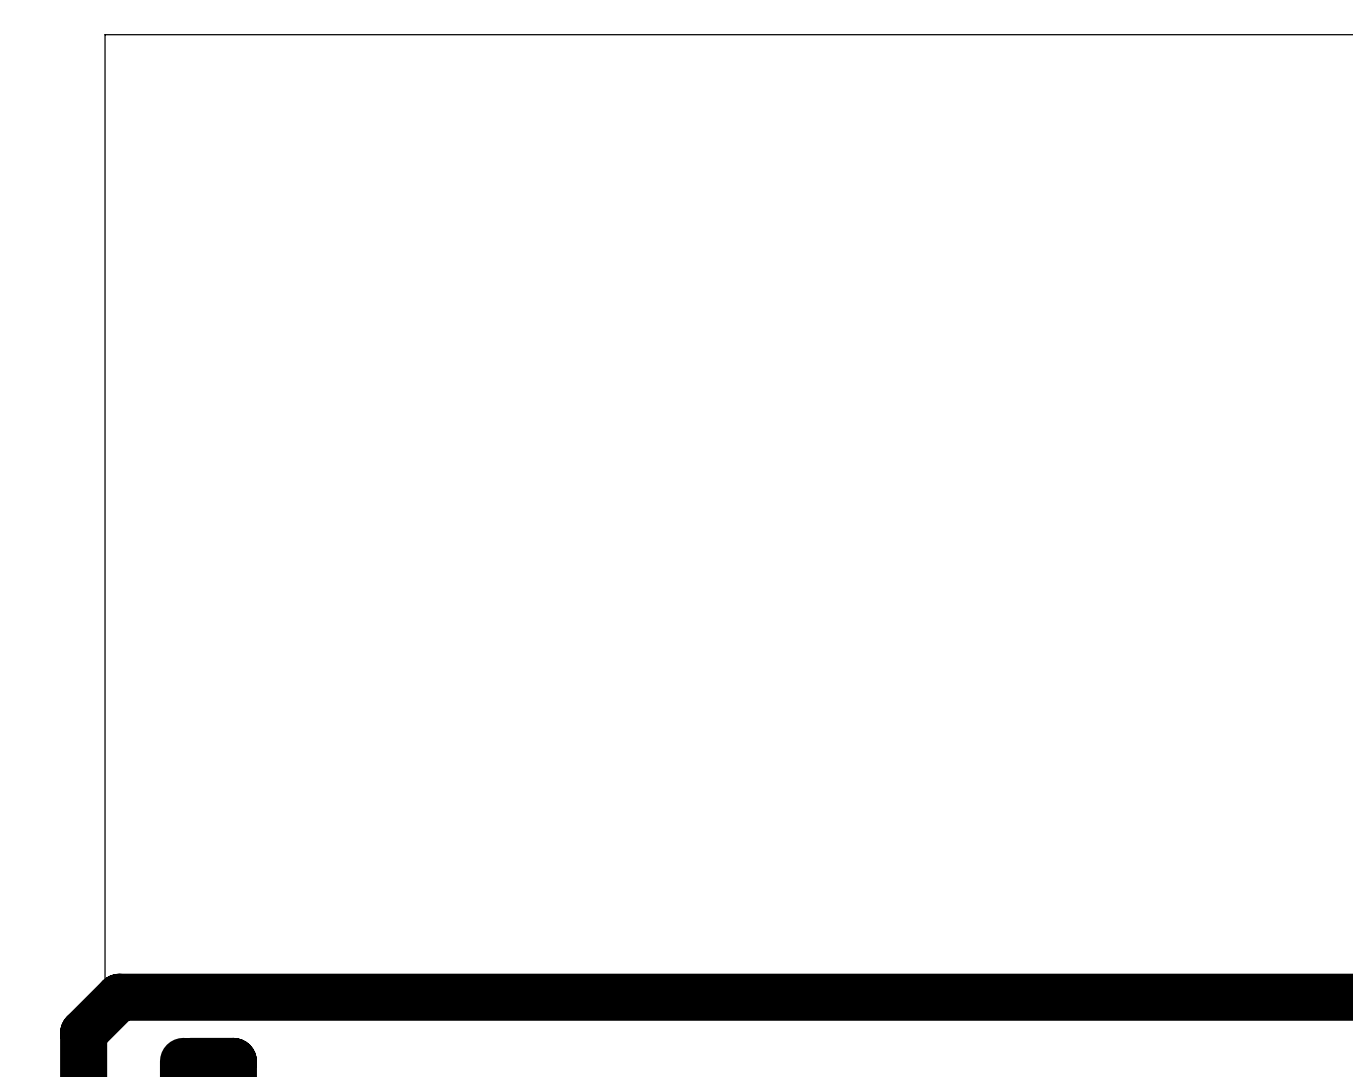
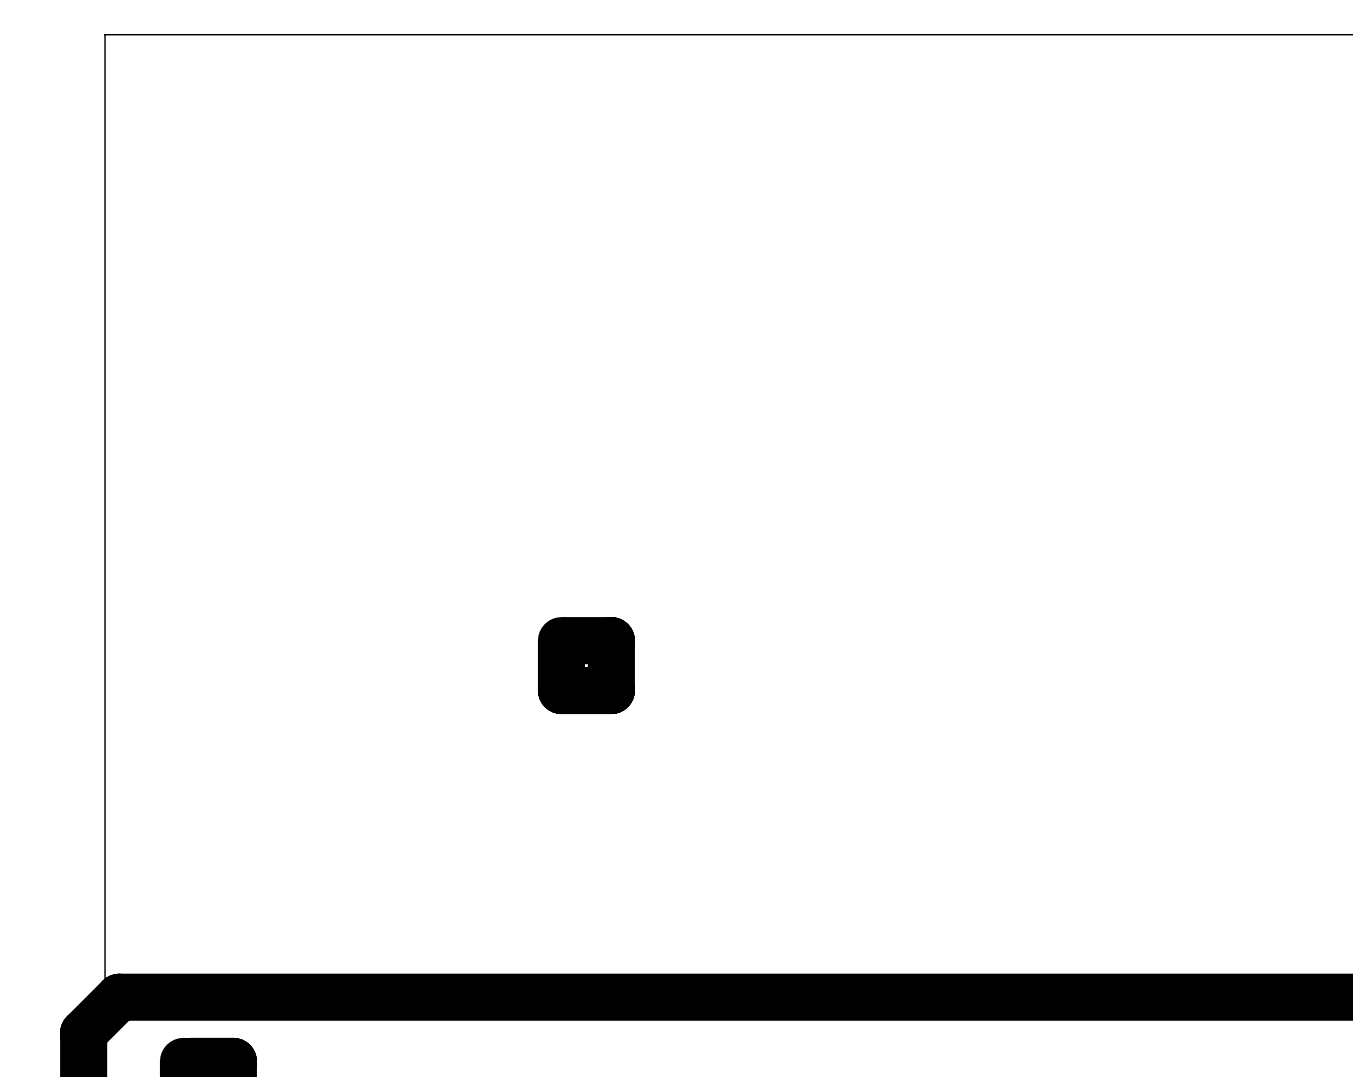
board edge: none -> (561, 640) (561, 690) (611, 690) (611, 640) (568, 640)

